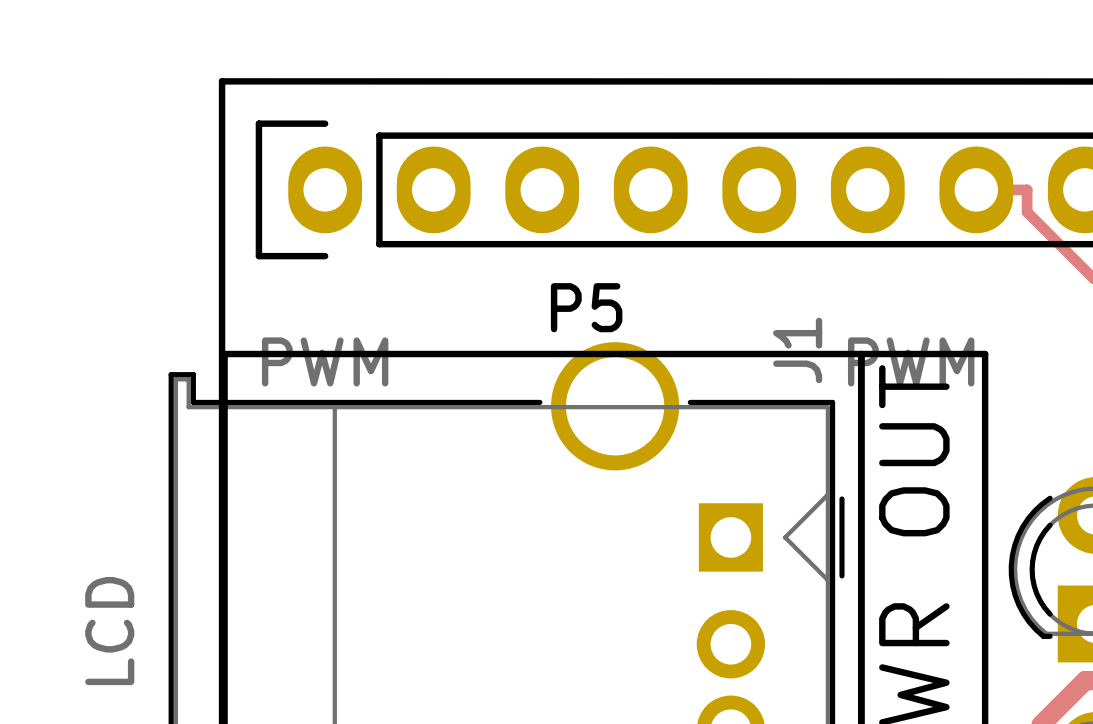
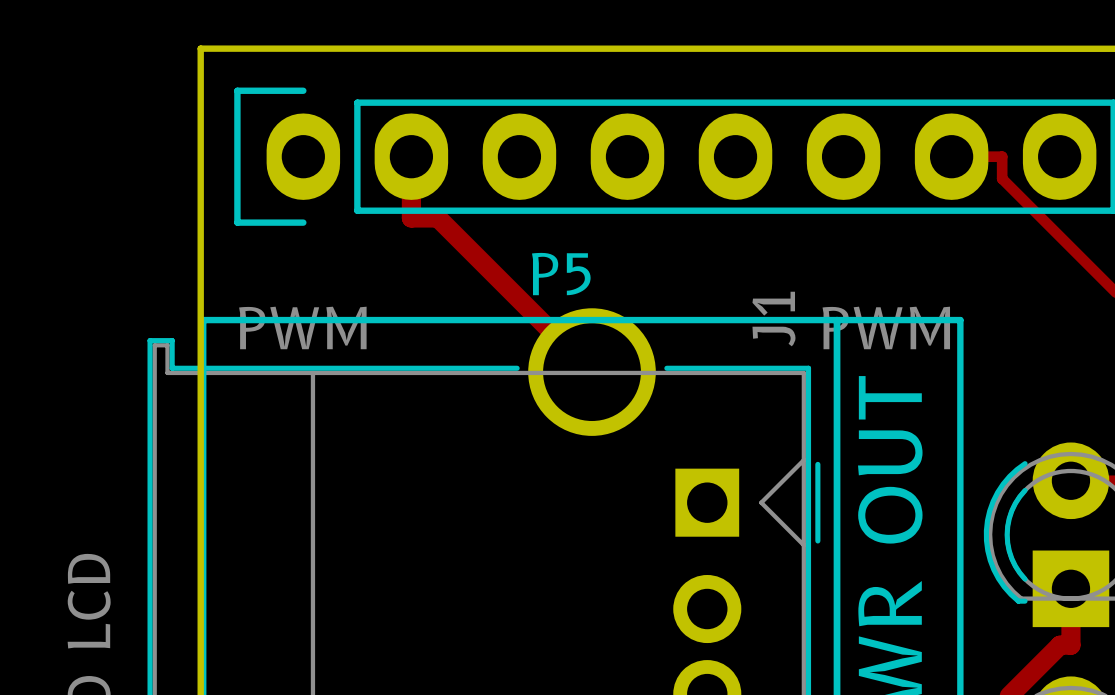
track: none -> (411, 156) (411, 217) (437, 217) (592, 372)

